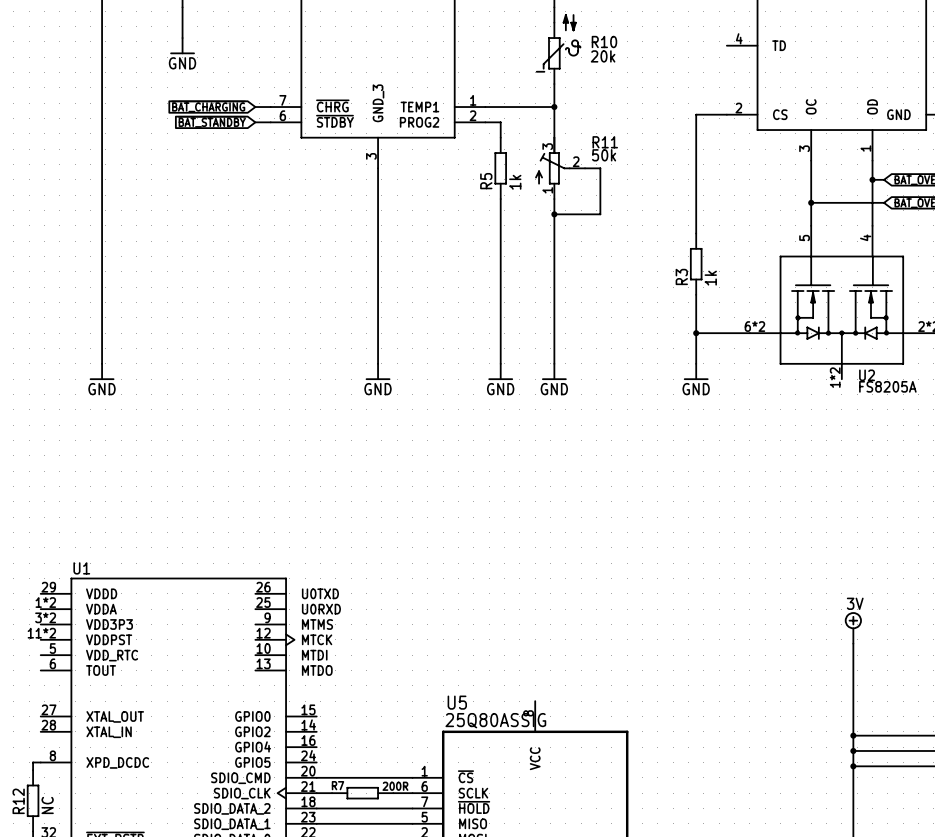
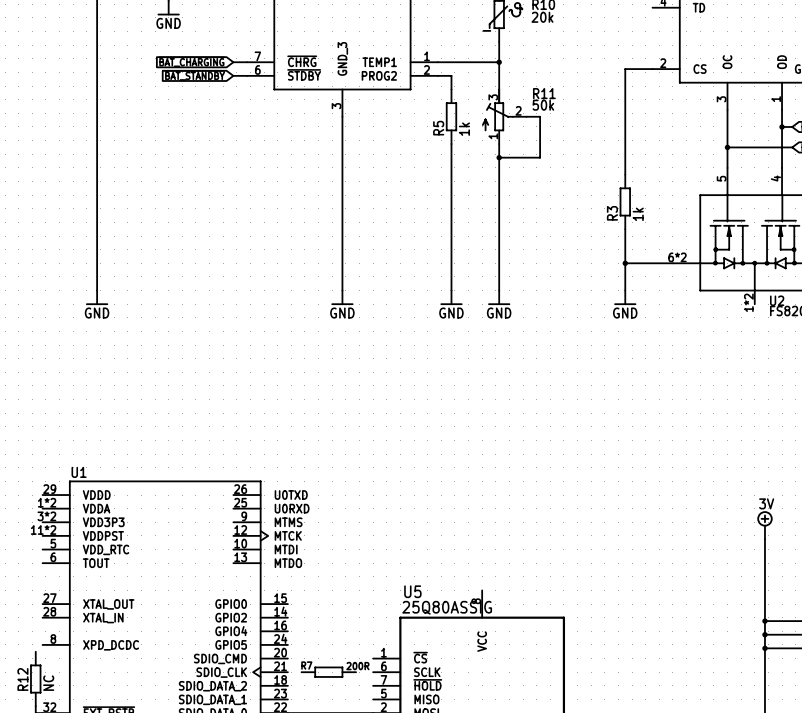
wire: (40, 762) (33, 762) (33, 770) -> none
wire: (316, 777) (412, 777) -> none
wire: (316, 793) (332, 793) -> none
wire: (393, 793) (412, 793) -> none
wire: (316, 808) (412, 808) -> none
wire: (316, 823) (412, 823) -> none

